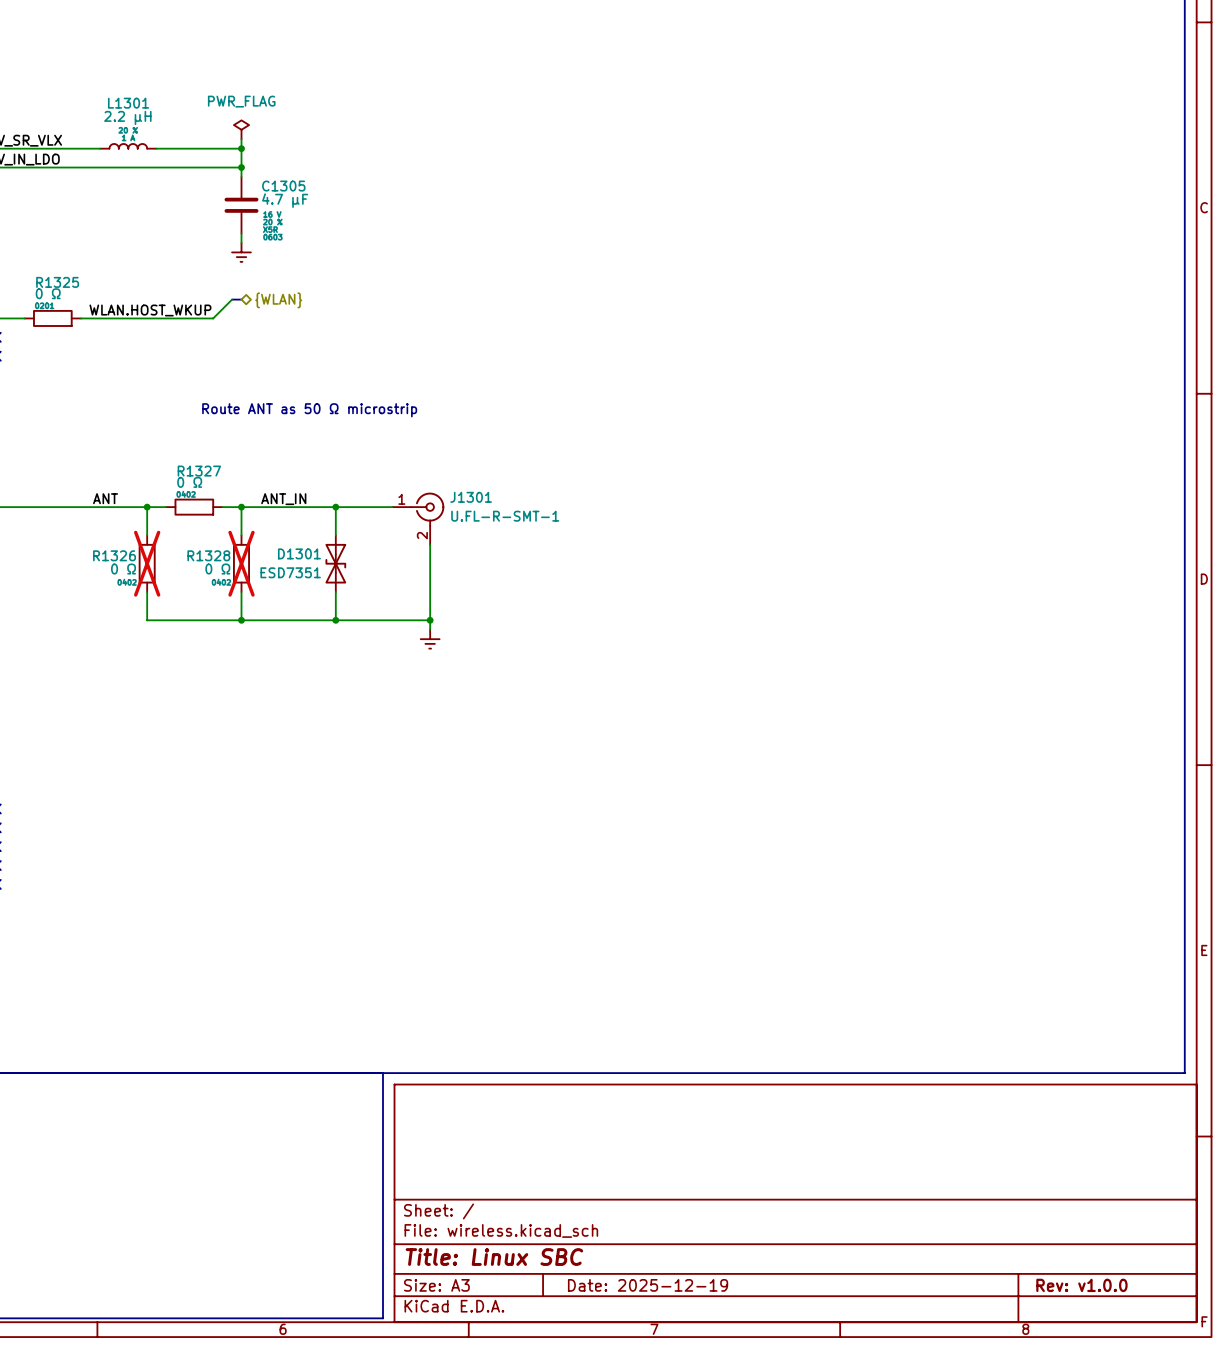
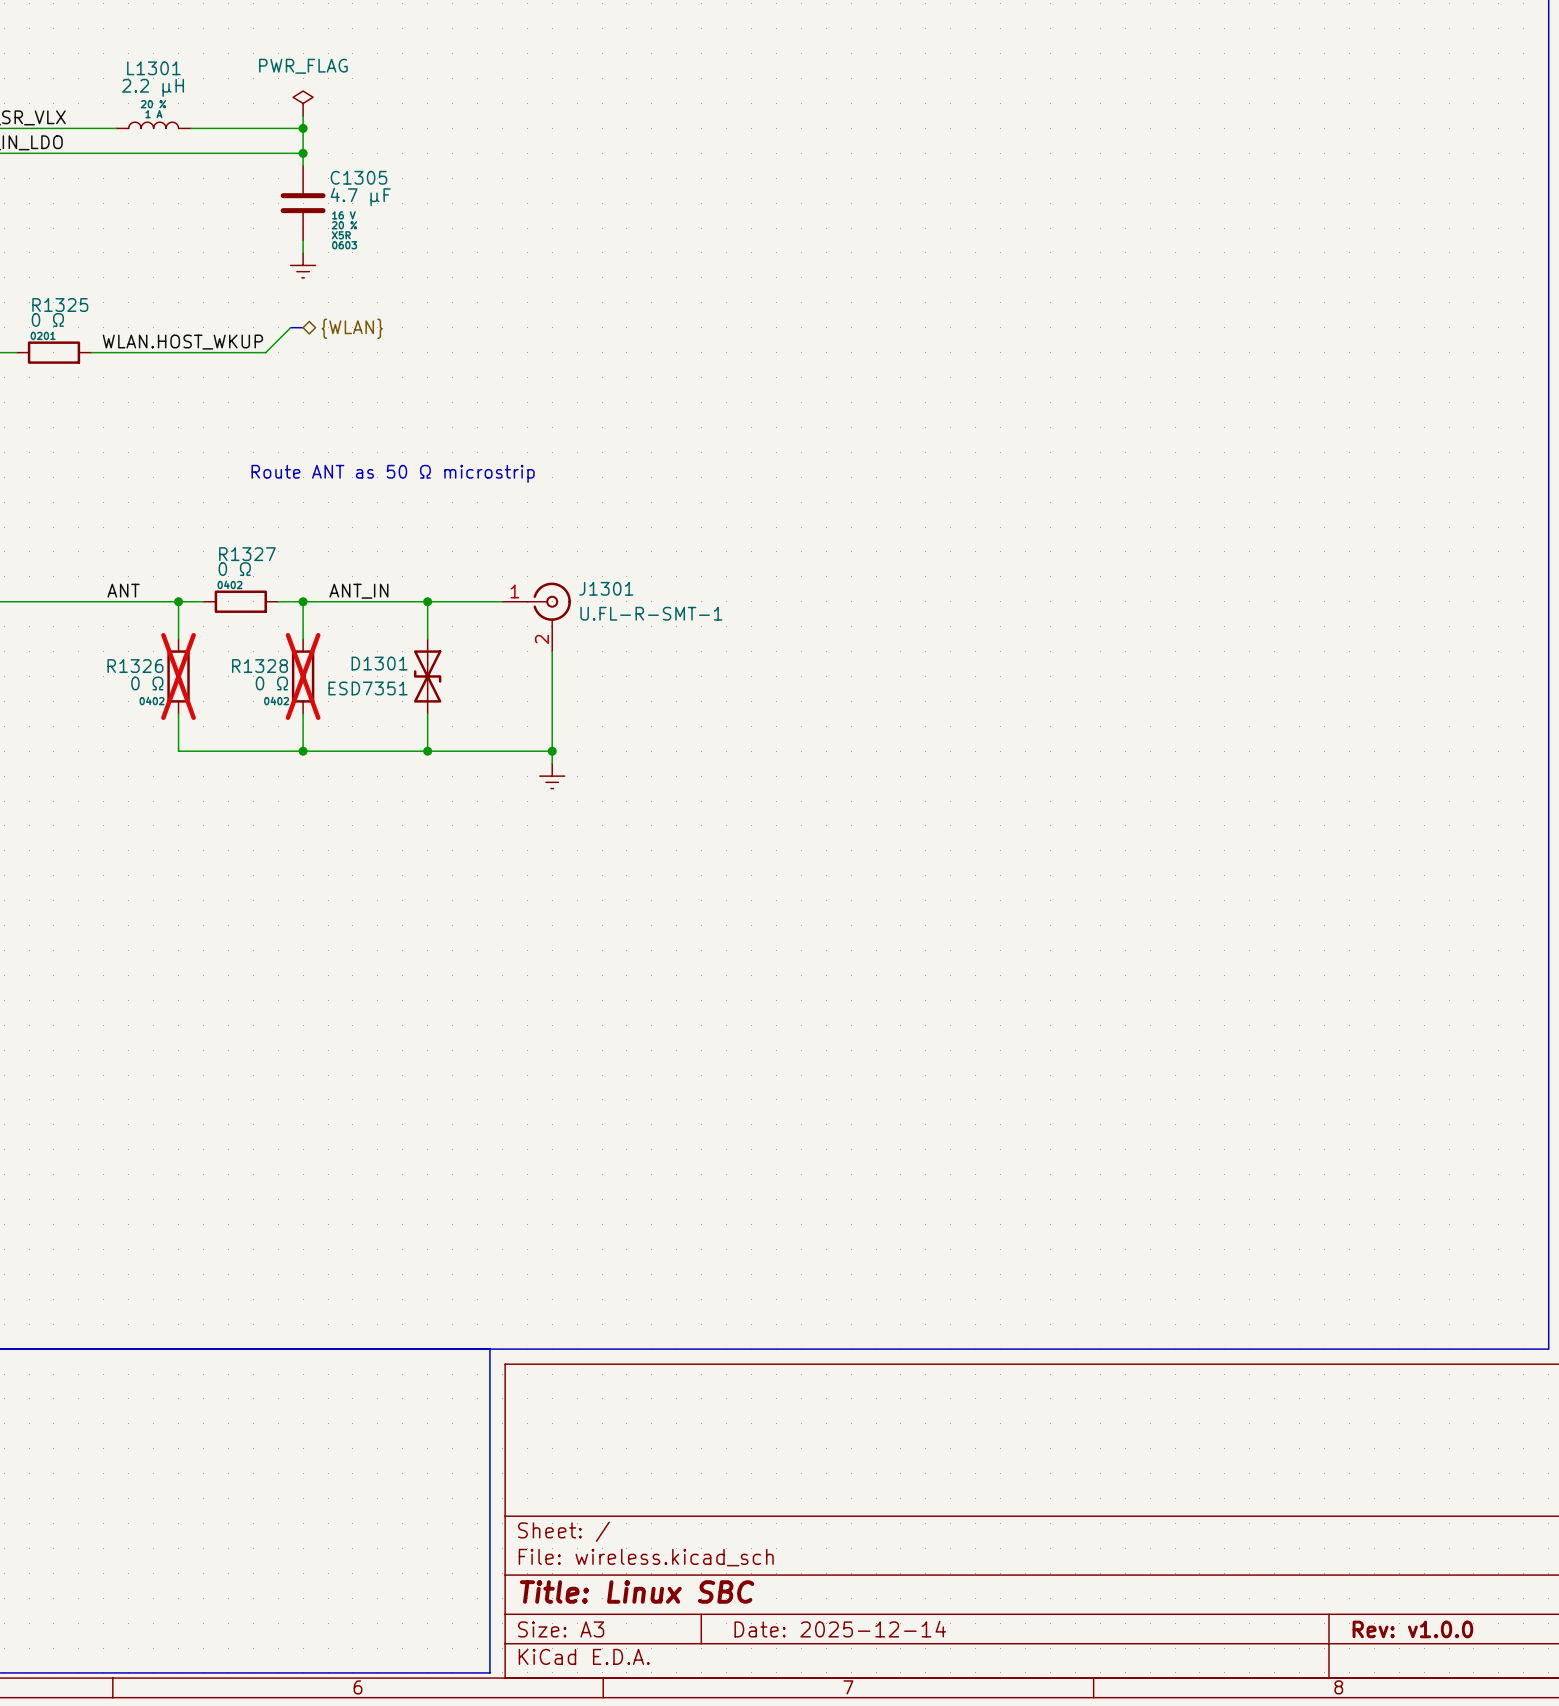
title block: Date: 2025-12-19 (648, 1285) -> Date: 2025-12-14 (840, 1629)

